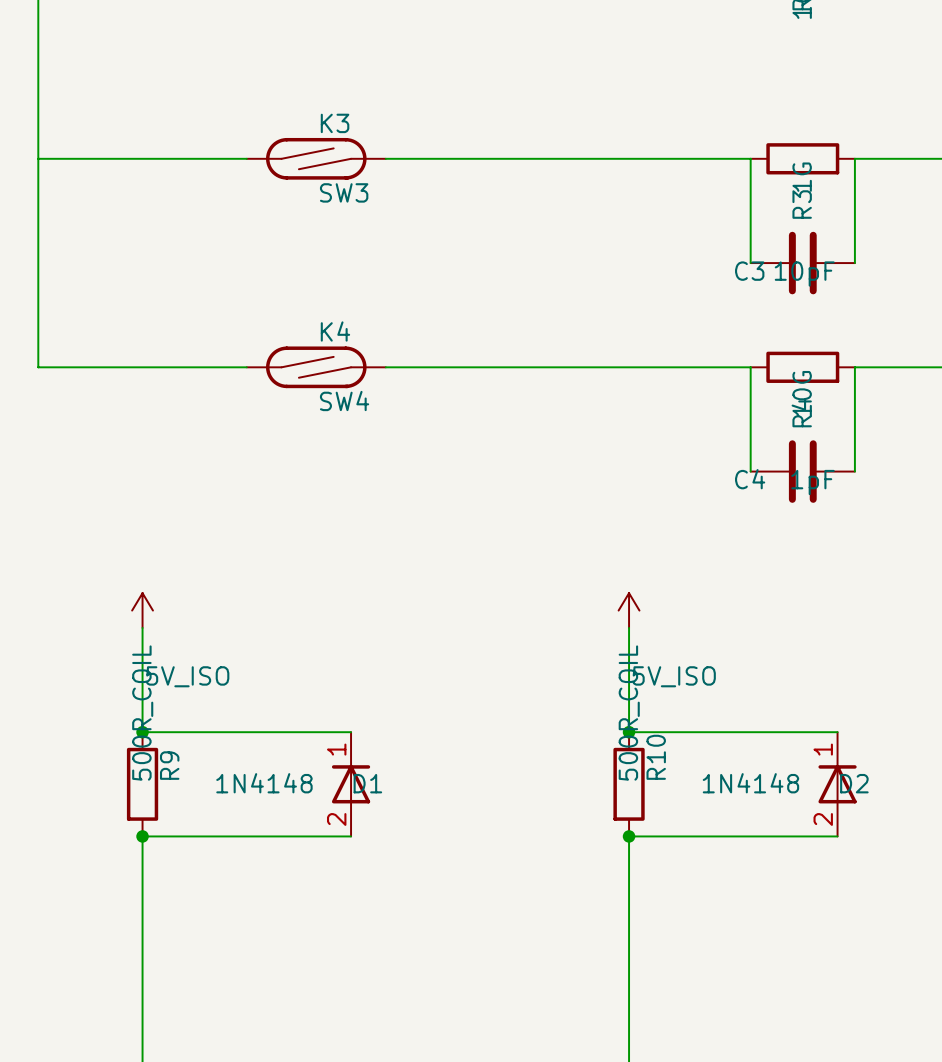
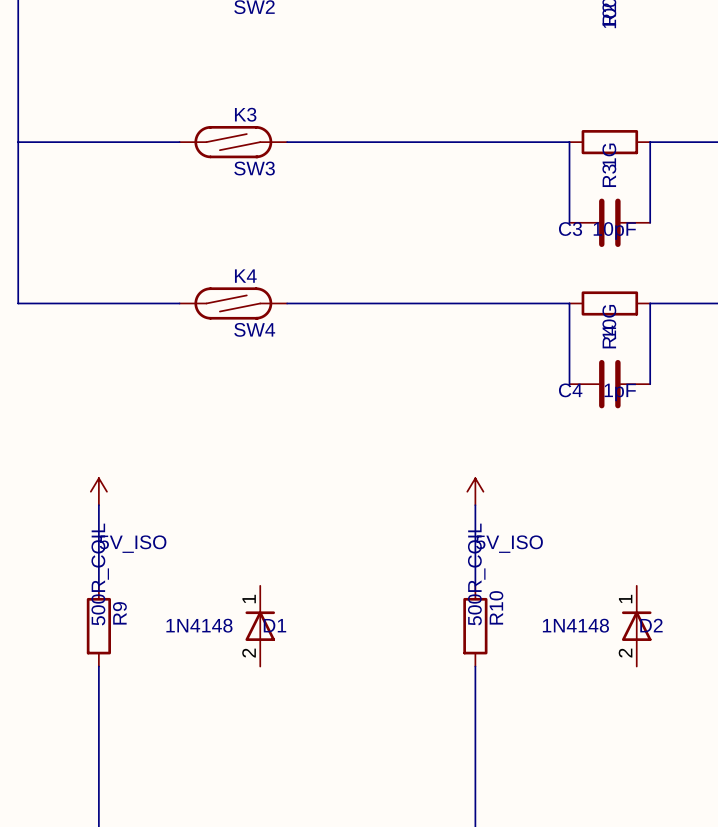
wire: (142, 732) (351, 732) -> none
junction: (142, 732) -> none
wire: (629, 732) (837, 732) -> none
junction: (629, 732) -> none
wire: (142, 836) (351, 836) -> none
junction: (142, 836) -> none
wire: (629, 836) (837, 836) -> none
junction: (629, 836) -> none

